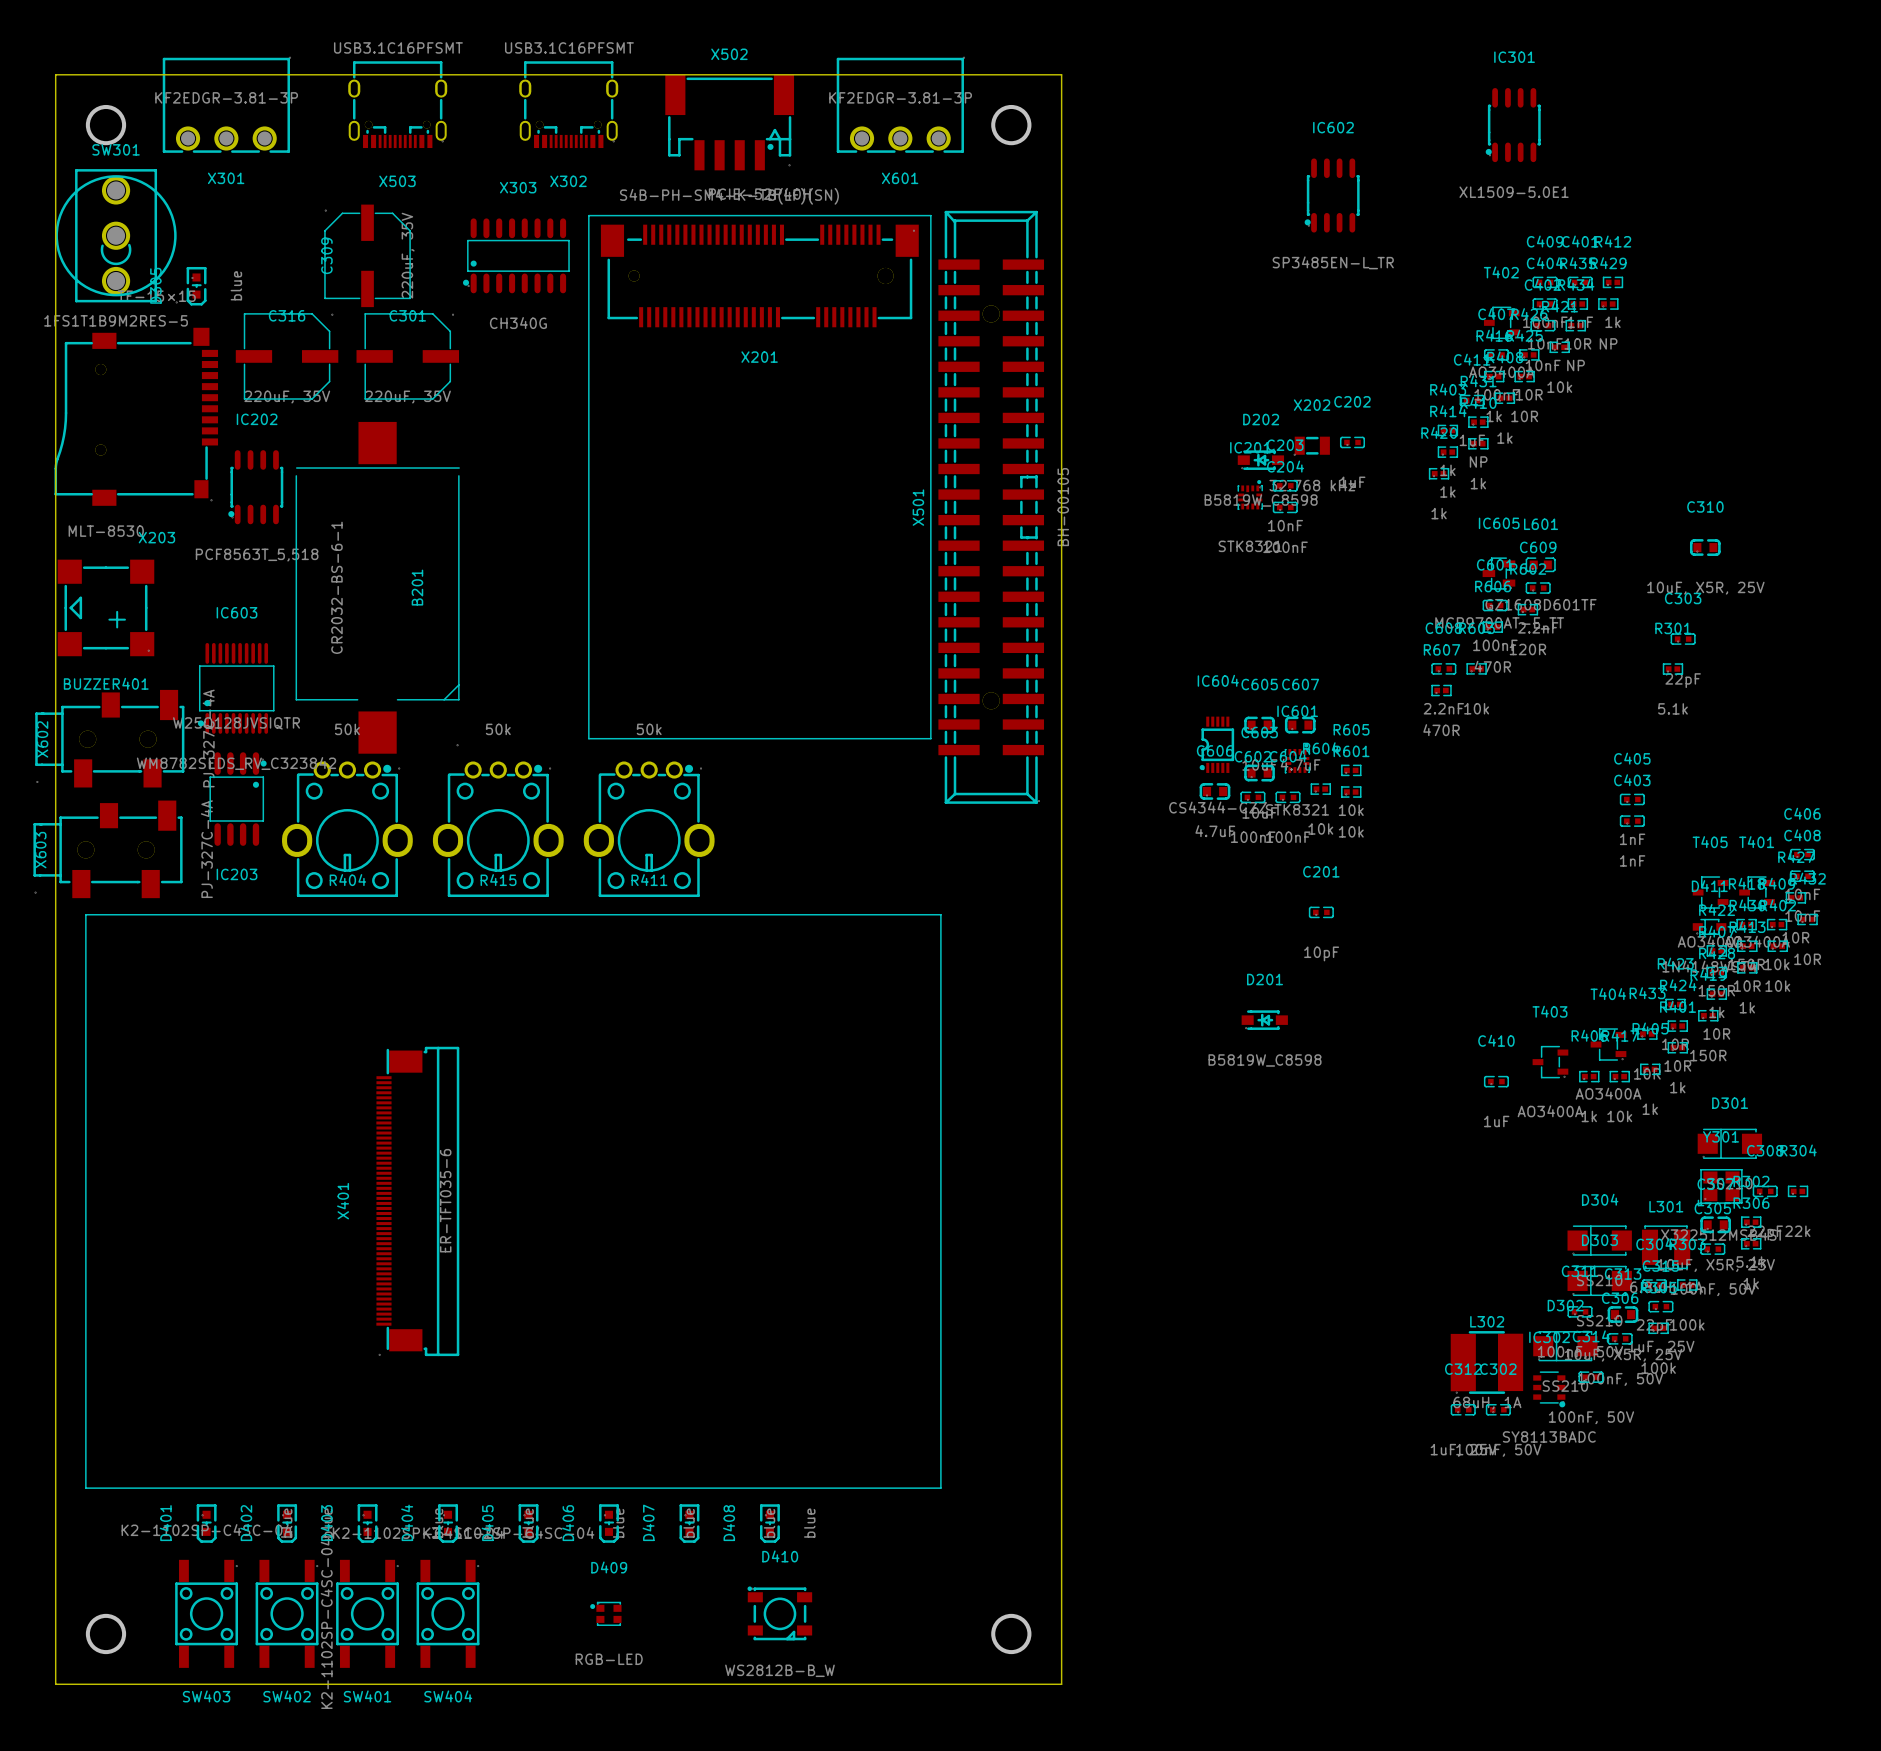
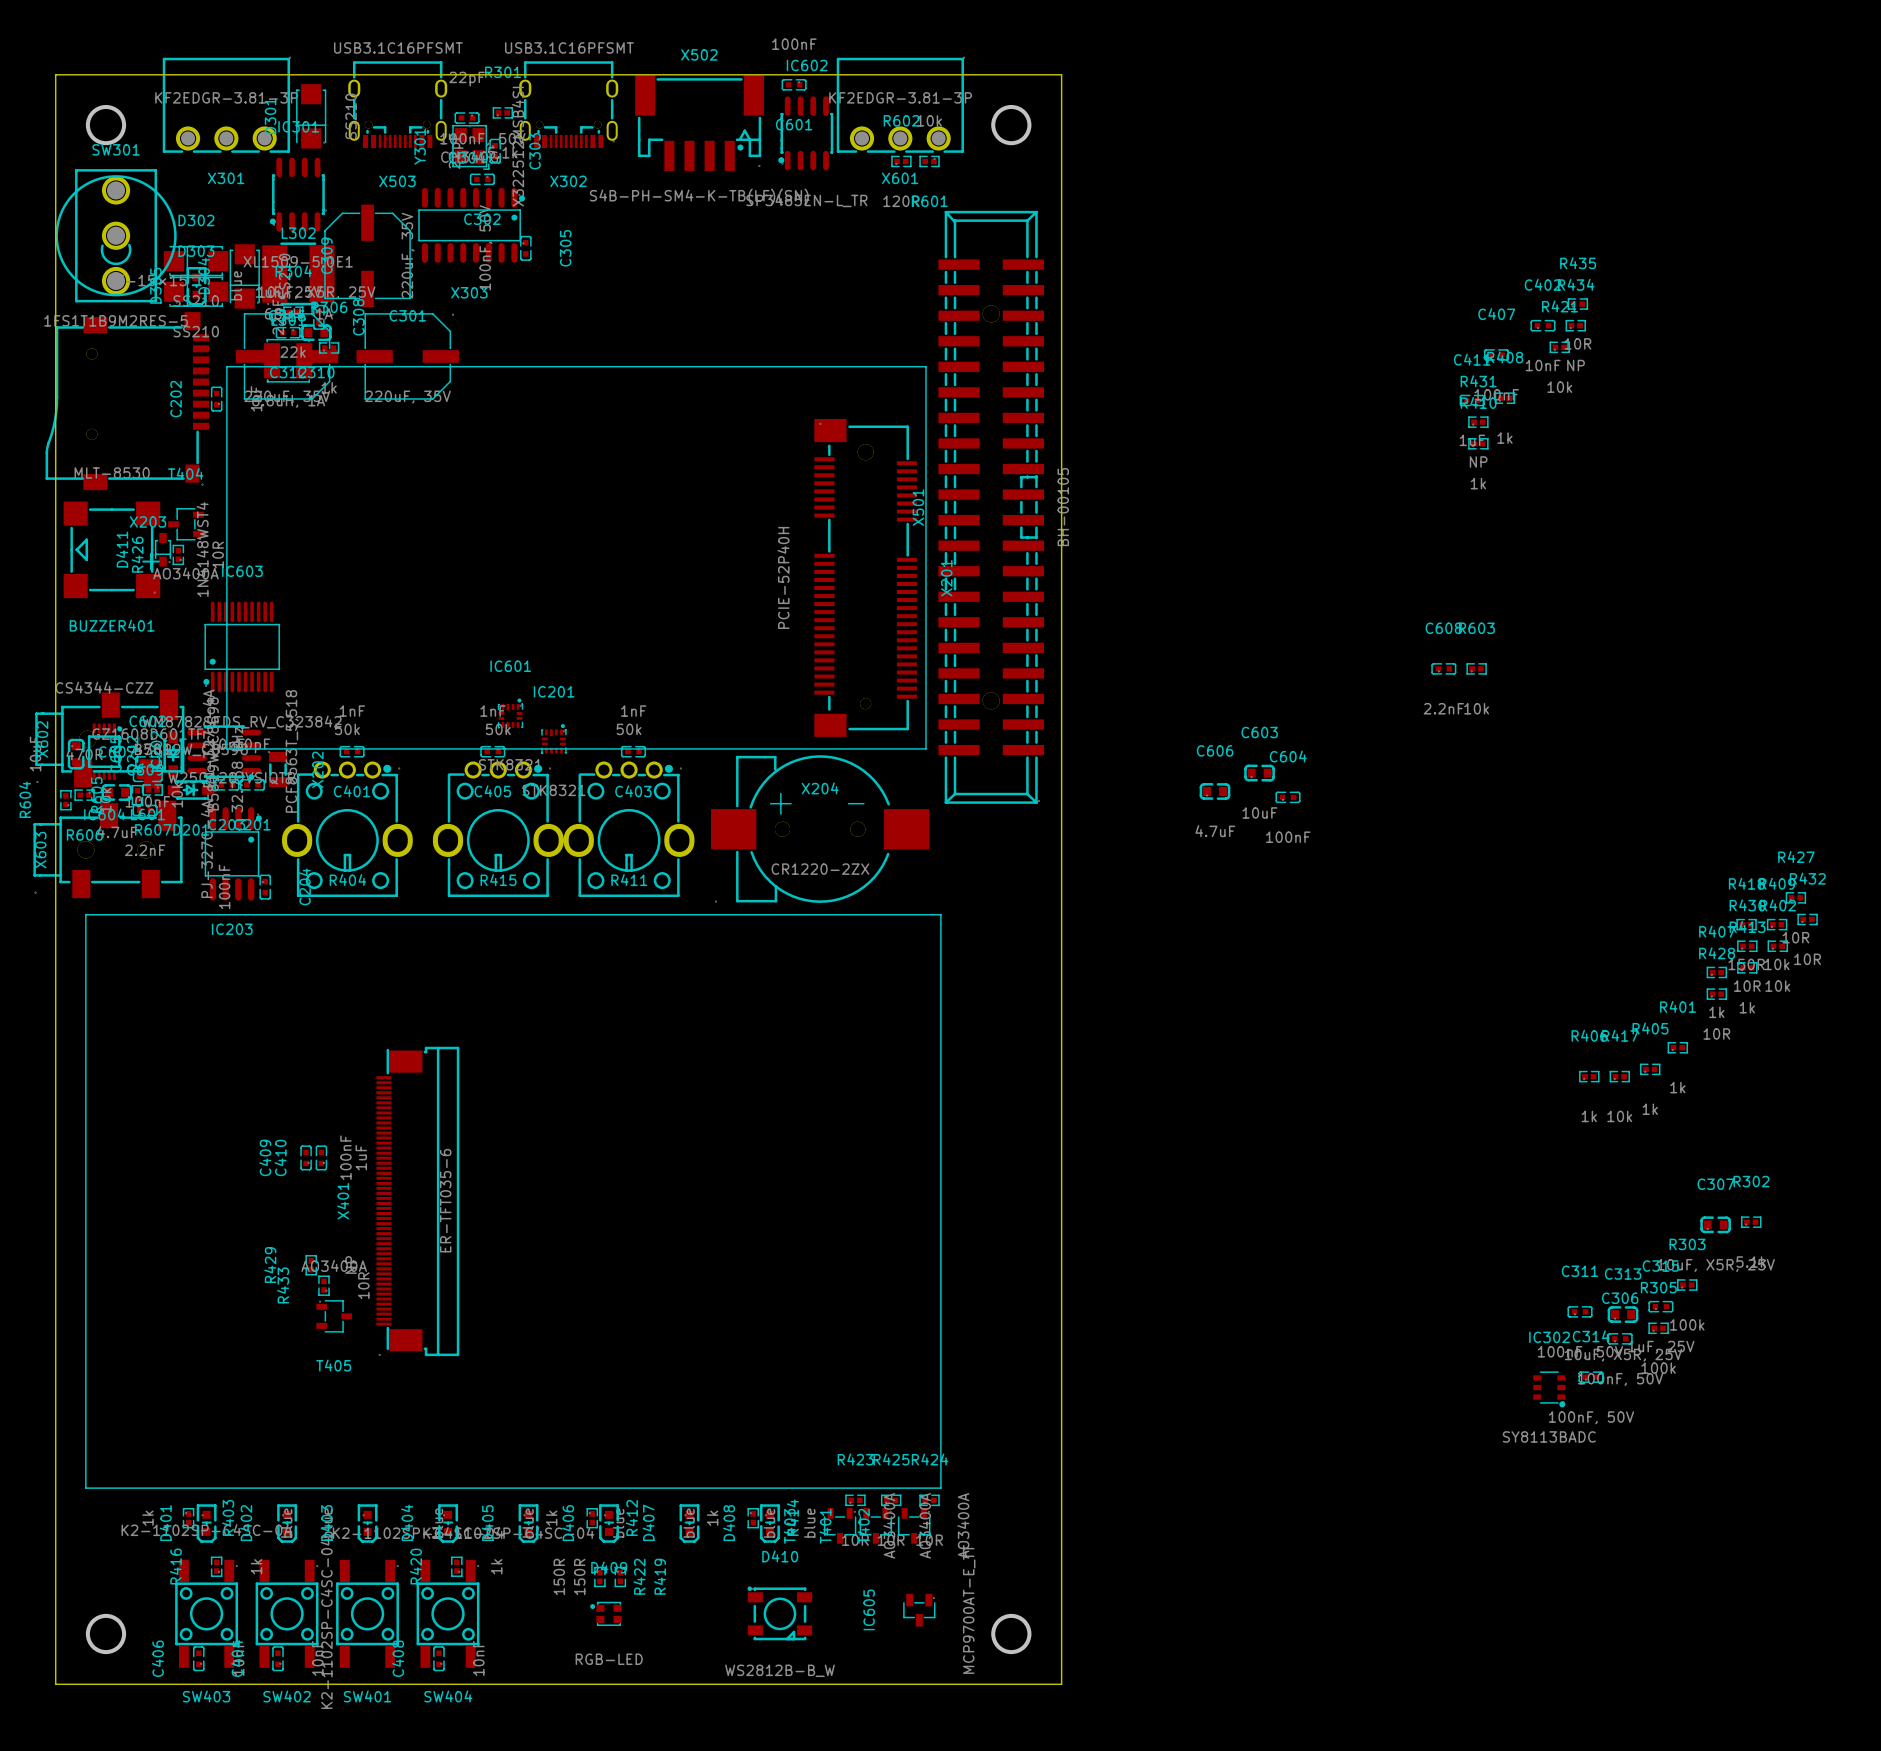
X502 position: (729, 122) -> (699, 123)
IC301 position: (1513, 125) -> (297, 194)
IC602 position: (1332, 195) -> (805, 133)
line: (588, 215) (930, 215) (930, 738) (588, 738) (588, 215) -> none
X303 rotation: 0° (516, 255) -> 180° (471, 225)
X201 rotation: 0° (759, 275) -> 90° counterclockwise (865, 577)
X201 position: (759, 275) -> (865, 577)
C409 rotation: 0° (1545, 282) -> 90° counterclockwise (306, 1157)
C409 position: (1545, 282) -> (306, 1157)
C401 rotation: 0° (1580, 282) -> 180° (352, 751)
C401 position: (1580, 282) -> (352, 751)
R412 rotation: 0° (1612, 282) -> 90° clockwise (592, 1518)
R412 position: (1612, 282) -> (592, 1518)
C404 rotation: 0° (1545, 304) -> 90° counterclockwise (277, 1658)
C404 position: (1545, 304) -> (277, 1658)
R429 rotation: 0° (1608, 304) -> 90° counterclockwise (311, 1265)
R429 position: (1608, 304) -> (311, 1265)
T402 rotation: 0° (1501, 322) -> 90° counterclockwise (914, 1525)
T402 position: (1501, 322) -> (914, 1525)
R426 rotation: 0° (1529, 354) -> 90° counterclockwise (178, 554)
R426 position: (1529, 354) -> (178, 554)
line: none -> (226, 366) (926, 366) (926, 748) (226, 748) (226, 366)
R416 rotation: 0° (1494, 376) -> 90° counterclockwise (216, 1566)
R416 position: (1494, 376) -> (216, 1566)
R425 position: (1524, 376) -> (891, 1500)
X203 position: (136, 416) -> (127, 401)
R403 rotation: 0° (1447, 430) -> 90° clockwise (188, 1518)
R403 position: (1447, 430) -> (188, 1518)
C202 rotation: 0° (1352, 442) -> 90° counterclockwise (216, 399)
C202 position: (1352, 442) -> (216, 399)
X202 rotation: 0° (1312, 446) -> 90° clockwise (277, 769)
X202 position: (1312, 446) -> (277, 769)
R414 rotation: 0° (1447, 452) -> 90° clockwise (753, 1518)
R414 position: (1447, 452) -> (753, 1518)
D202 rotation: 0° (1260, 460) -> 90° counterclockwise (173, 754)
D202 position: (1260, 460) -> (173, 754)
R420 rotation: 0° (1439, 473) -> 90° counterclockwise (456, 1566)
R420 position: (1439, 473) -> (456, 1566)
C203 rotation: 0° (1285, 485) -> 180° (226, 784)
C203 position: (1285, 485) -> (226, 784)
IC202 rotation: 0° (255, 487) -> 90° counterclockwise (224, 752)
IC202 position: (255, 487) -> (224, 752)
IC201 position: (1250, 494) -> (553, 738)
C204 rotation: 0° (1285, 507) -> 90° clockwise (265, 887)
C204 position: (1285, 507) -> (265, 887)
C310 rotation: 0° (1705, 547) -> 180° (316, 332)
C310 position: (1705, 547) -> (316, 332)
L601 rotation: 0° (1540, 564) -> 180° (147, 774)
L601 position: (1540, 564) -> (147, 774)
IC605 rotation: 0° (1498, 573) -> 90° counterclockwise (919, 1610)
IC605 position: (1498, 573) -> (919, 1610)
B201: CR2032-BS-6-1 (377, 587) -> none
C609 position: (1538, 588) -> (145, 810)
C601 rotation: 0° (1495, 605) -> 180° (794, 84)
C601 position: (1495, 605) -> (794, 84)
BUZZER401 position: (105, 607) -> (111, 549)
R602 position: (1527, 609) -> (901, 161)
R606 rotation: 0° (1492, 627) -> 180° (84, 795)
R606 position: (1492, 627) -> (84, 795)
C303 rotation: 0° (1683, 639) -> 90° clockwise (495, 151)
C303 position: (1683, 639) -> (495, 151)
R301 position: (1672, 669) -> (502, 112)
IC603 position: (236, 688) -> (241, 646)
R607 rotation: 0° (1441, 690) -> 180° (152, 790)
R607 position: (1441, 690) -> (152, 790)
C605 rotation: 0° (1259, 725) -> 90° clockwise (76, 754)
C605 position: (1259, 725) -> (76, 754)
C607 position: (1300, 725) -> (116, 792)
IC604 rotation: 0° (1216, 744) -> 180° (105, 751)
IC604 position: (1216, 744) -> (105, 751)
IC601 position: (1297, 758) -> (510, 713)
R605 rotation: 0° (1351, 770) -> 90° counterclockwise (137, 795)
R605 position: (1351, 770) -> (137, 795)
R604 rotation: 0° (1320, 789) -> 90° counterclockwise (65, 800)
R604 position: (1320, 789) -> (65, 800)
R601 rotation: 0° (1351, 792) -> 180° (929, 161)
R601 position: (1351, 792) -> (929, 161)
C602 position: (1252, 797) -> (147, 761)
IC203 position: (238, 799) -> (233, 853)
C405 rotation: 0° (1632, 799) -> 180° (492, 751)
C405 position: (1632, 799) -> (492, 751)
C403 rotation: 0° (1632, 821) -> 180° (633, 751)
C403 position: (1632, 821) -> (633, 751)
R411 position: (649, 829) -> (629, 829)
X204: none -> CR1220-2ZX (820, 829)
C406 rotation: 0° (1802, 854) -> 90° counterclockwise (198, 1658)
C406 position: (1802, 854) -> (198, 1658)
C408 rotation: 0° (1802, 876) -> 90° counterclockwise (438, 1658)
C408 position: (1802, 876) -> (438, 1658)
T405 rotation: 0° (1710, 892) -> 180° (334, 1316)
T405 position: (1710, 892) -> (334, 1316)
T401 rotation: 0° (1757, 892) -> 90° counterclockwise (875, 1525)
T401 position: (1757, 892) -> (875, 1525)
C201 rotation: 0° (1321, 912) -> 180° (252, 784)
C201 position: (1321, 912) -> (252, 784)
D411 rotation: 0° (1709, 926) -> 90° counterclockwise (163, 549)
D411 position: (1709, 926) -> (163, 549)
R422 rotation: 0° (1716, 950) -> 90° clockwise (599, 1576)
R422 position: (1716, 950) -> (599, 1576)
R423 position: (1675, 1004) -> (855, 1500)
R419 rotation: 0° (1708, 1015) -> 90° clockwise (620, 1576)
R419 position: (1708, 1015) -> (620, 1576)
D201 rotation: 0° (1264, 1020) -> 180° (191, 790)
D201 position: (1264, 1020) -> (191, 790)
R424 position: (1677, 1026) -> (929, 1500)
R433 rotation: 0° (1647, 1034) -> 90° counterclockwise (323, 1285)
R433 position: (1647, 1034) -> (323, 1285)
T404 position: (1608, 1044) -> (186, 524)
T403 rotation: 0° (1550, 1062) -> 90° counterclockwise (840, 1525)
T403 position: (1550, 1062) -> (840, 1525)
C410 rotation: 0° (1496, 1081) -> 90° counterclockwise (321, 1157)
C410 position: (1496, 1081) -> (321, 1157)
D301 rotation: 0° (1729, 1143) -> 90° counterclockwise (311, 116)
D301 position: (1729, 1143) -> (311, 116)
Y301 rotation: 0° (1720, 1187) -> 90° counterclockwise (470, 147)
Y301 position: (1720, 1187) -> (470, 147)
C308 rotation: 0° (1765, 1191) -> 90° clockwise (318, 317)
C308 position: (1765, 1191) -> (318, 317)
R304 position: (1798, 1191) -> (293, 312)
D304 rotation: 0° (1599, 1240) -> 90° counterclockwise (244, 276)
D304 position: (1599, 1240) -> (244, 276)
R306 position: (1751, 1243) -> (329, 347)
L301 position: (1666, 1247) -> (288, 360)
C305 rotation: 0° (1712, 1249) -> 90° clockwise (525, 248)
C305 position: (1712, 1249) -> (525, 248)
D303 position: (1599, 1280) -> (196, 291)
C304 rotation: 0° (1654, 1285) -> 180° (467, 118)
C304 position: (1654, 1285) -> (467, 118)
D302 position: (1565, 1346) -> (196, 261)
L302 position: (1486, 1362) -> (298, 273)
C312 rotation: 0° (1463, 1409) -> 180° (288, 332)
C312 position: (1463, 1409) -> (288, 332)
C302 rotation: 0° (1498, 1409) -> 180° (482, 179)
C302 position: (1498, 1409) -> (482, 179)

